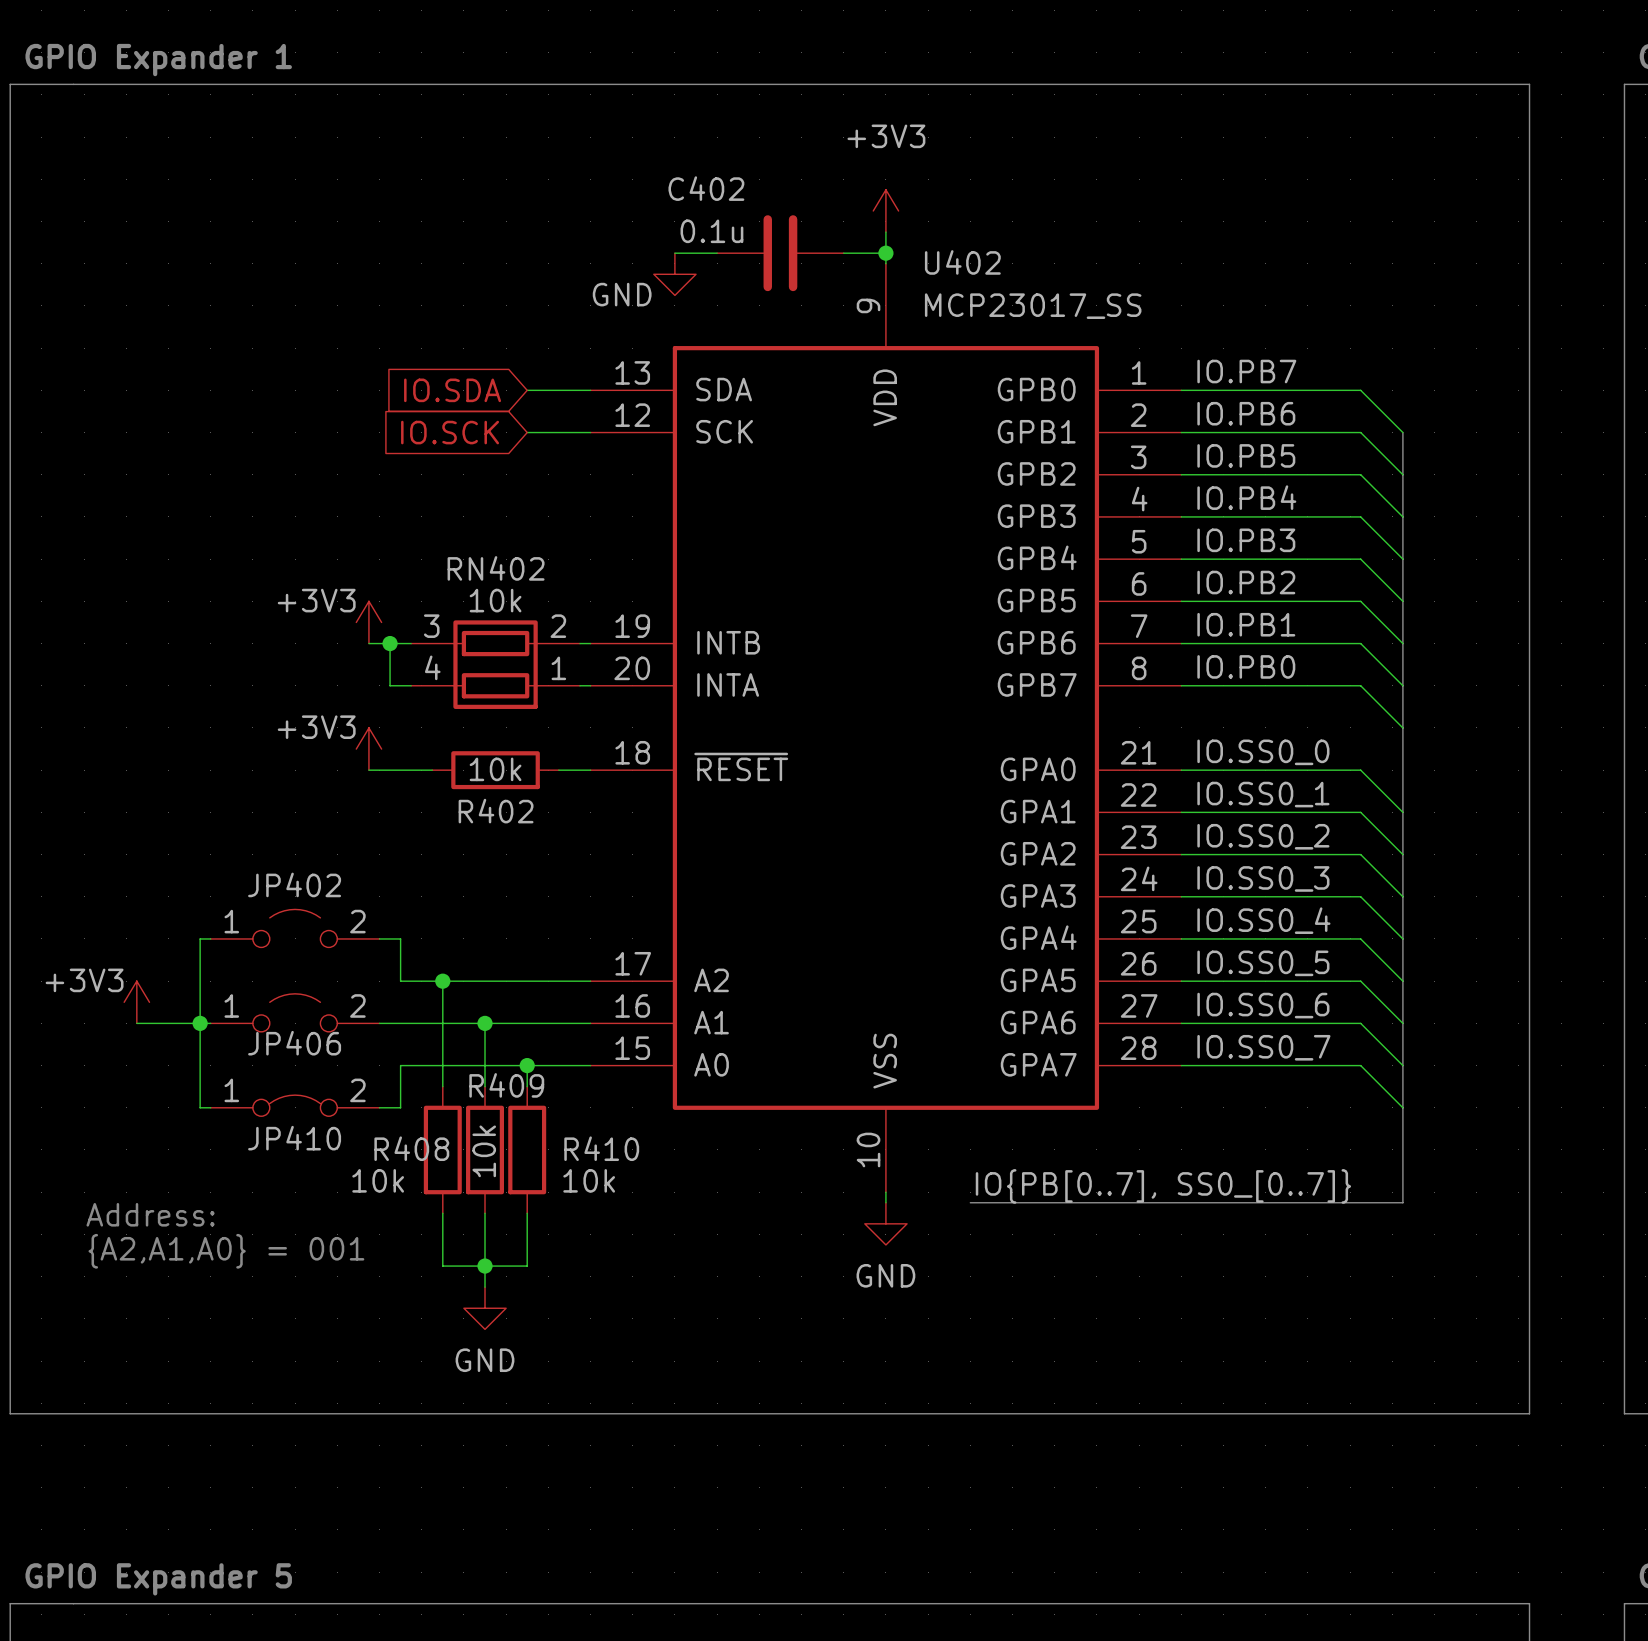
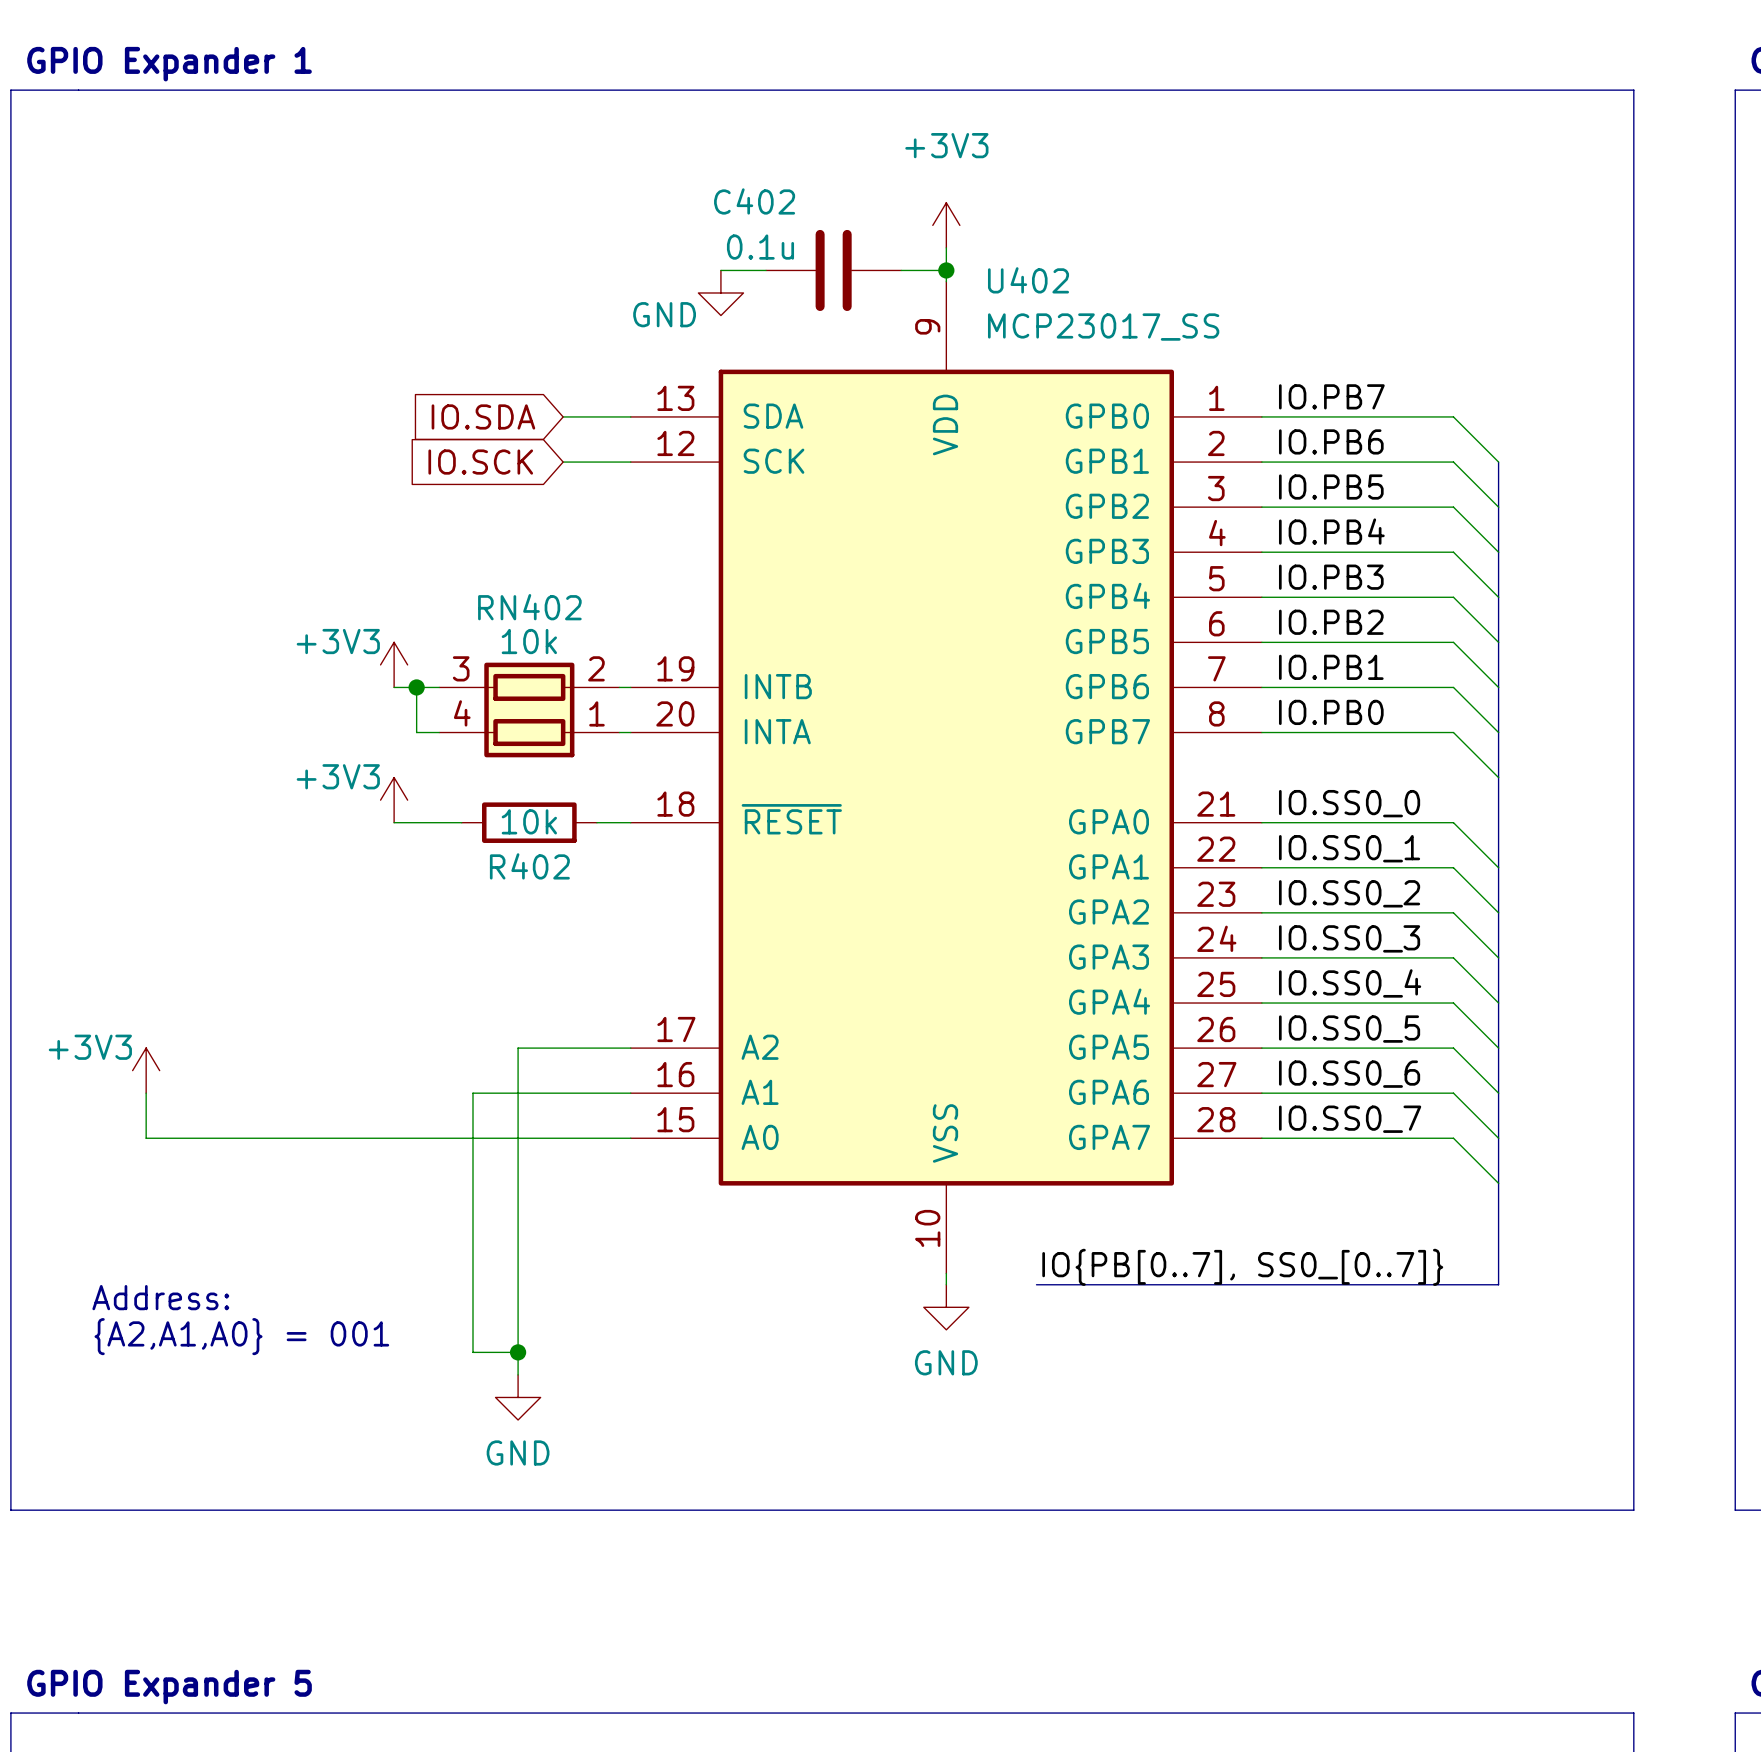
JP402: (295, 928) -> none
wire: (210, 938) (200, 938) (200, 1107) (210, 1107) -> none
wire: (379, 938) (400, 938) (400, 981) (485, 981) -> (518, 1093) (518, 1048)
wire: (442, 981) (442, 1023) (379, 1023) -> none
junction: (442, 981) -> none
JP406: (295, 1012) -> none
wire: (136, 1023) (210, 1023) -> (146, 1093) (146, 1138) (427, 1138)
junction: (200, 1023) -> none
junction: (485, 1023) -> none
wire: (400, 1065) (400, 1107) (379, 1107) -> none
wire: (527, 1065) (527, 1086) -> none
junction: (527, 1065) -> none
wire: none -> (472, 1160) (472, 1296)
wire: none -> (518, 1160) (518, 1296)
JP410: (295, 1105) -> none
R408: 10k (442, 1149) -> none
R409: 10k (485, 1149) -> none
R410: 10k (527, 1149) -> none
wire: (527, 1213) (527, 1266) (485, 1266) -> none

